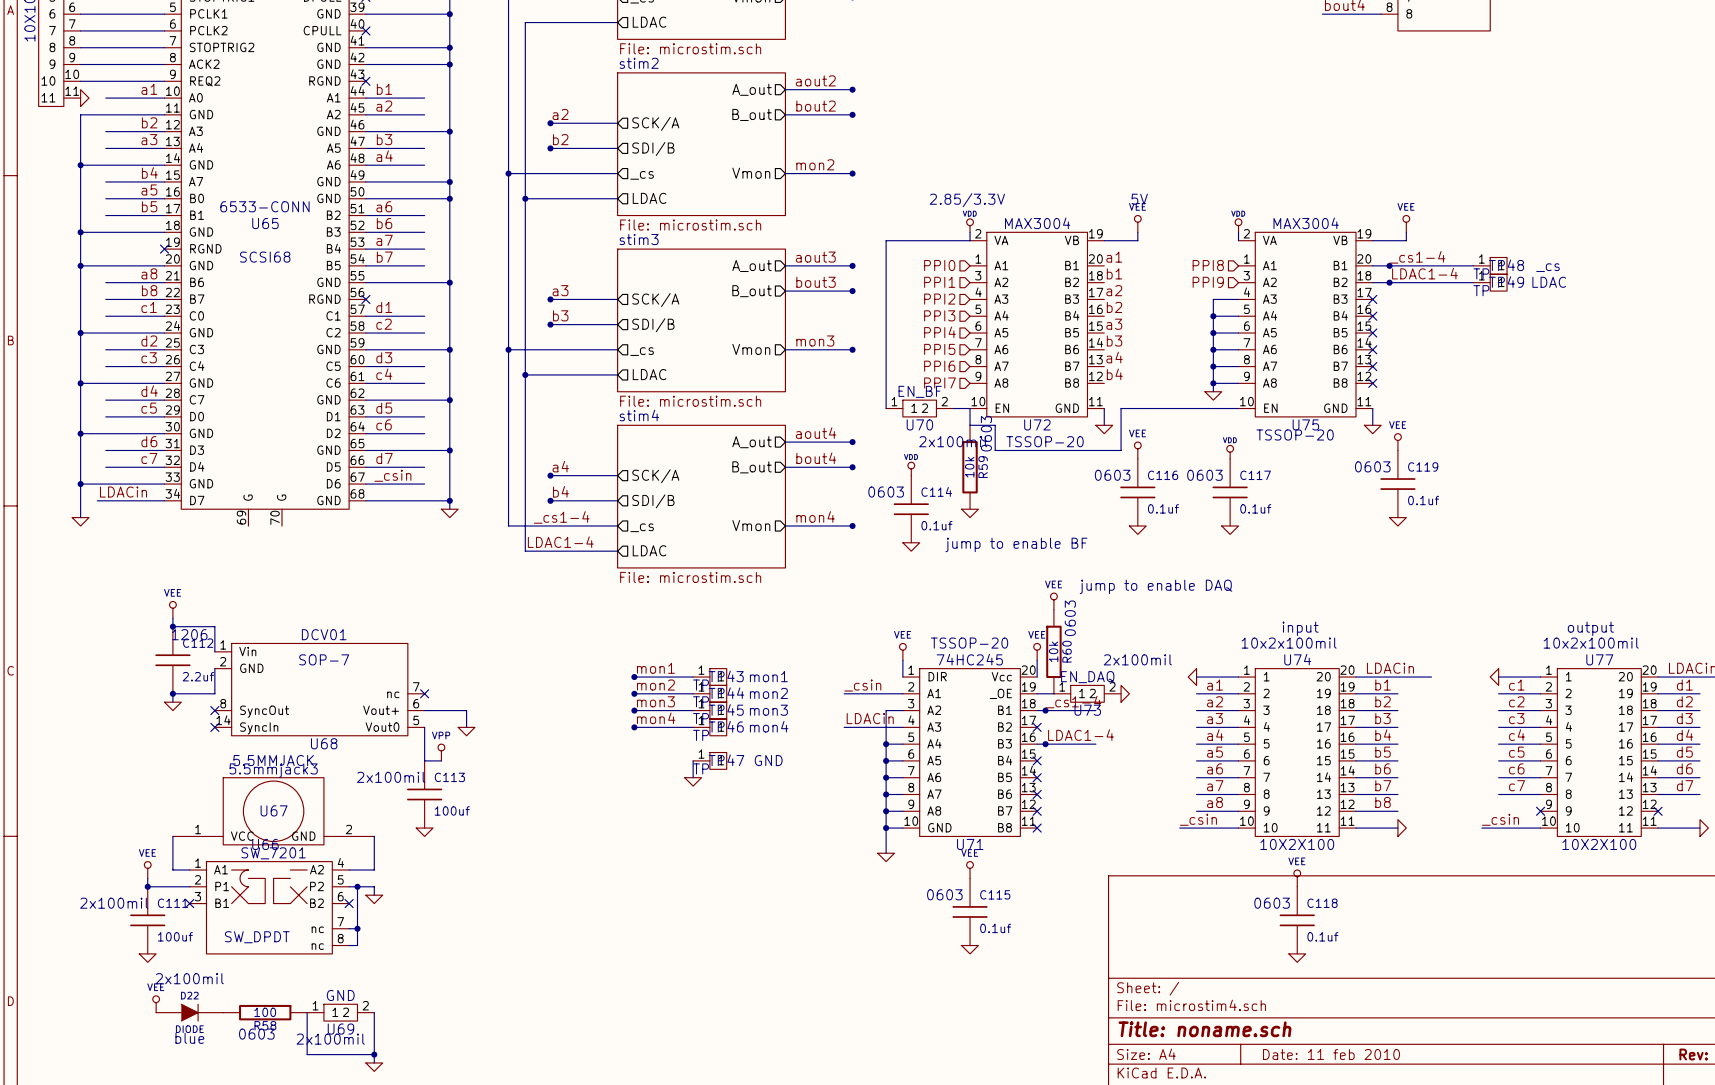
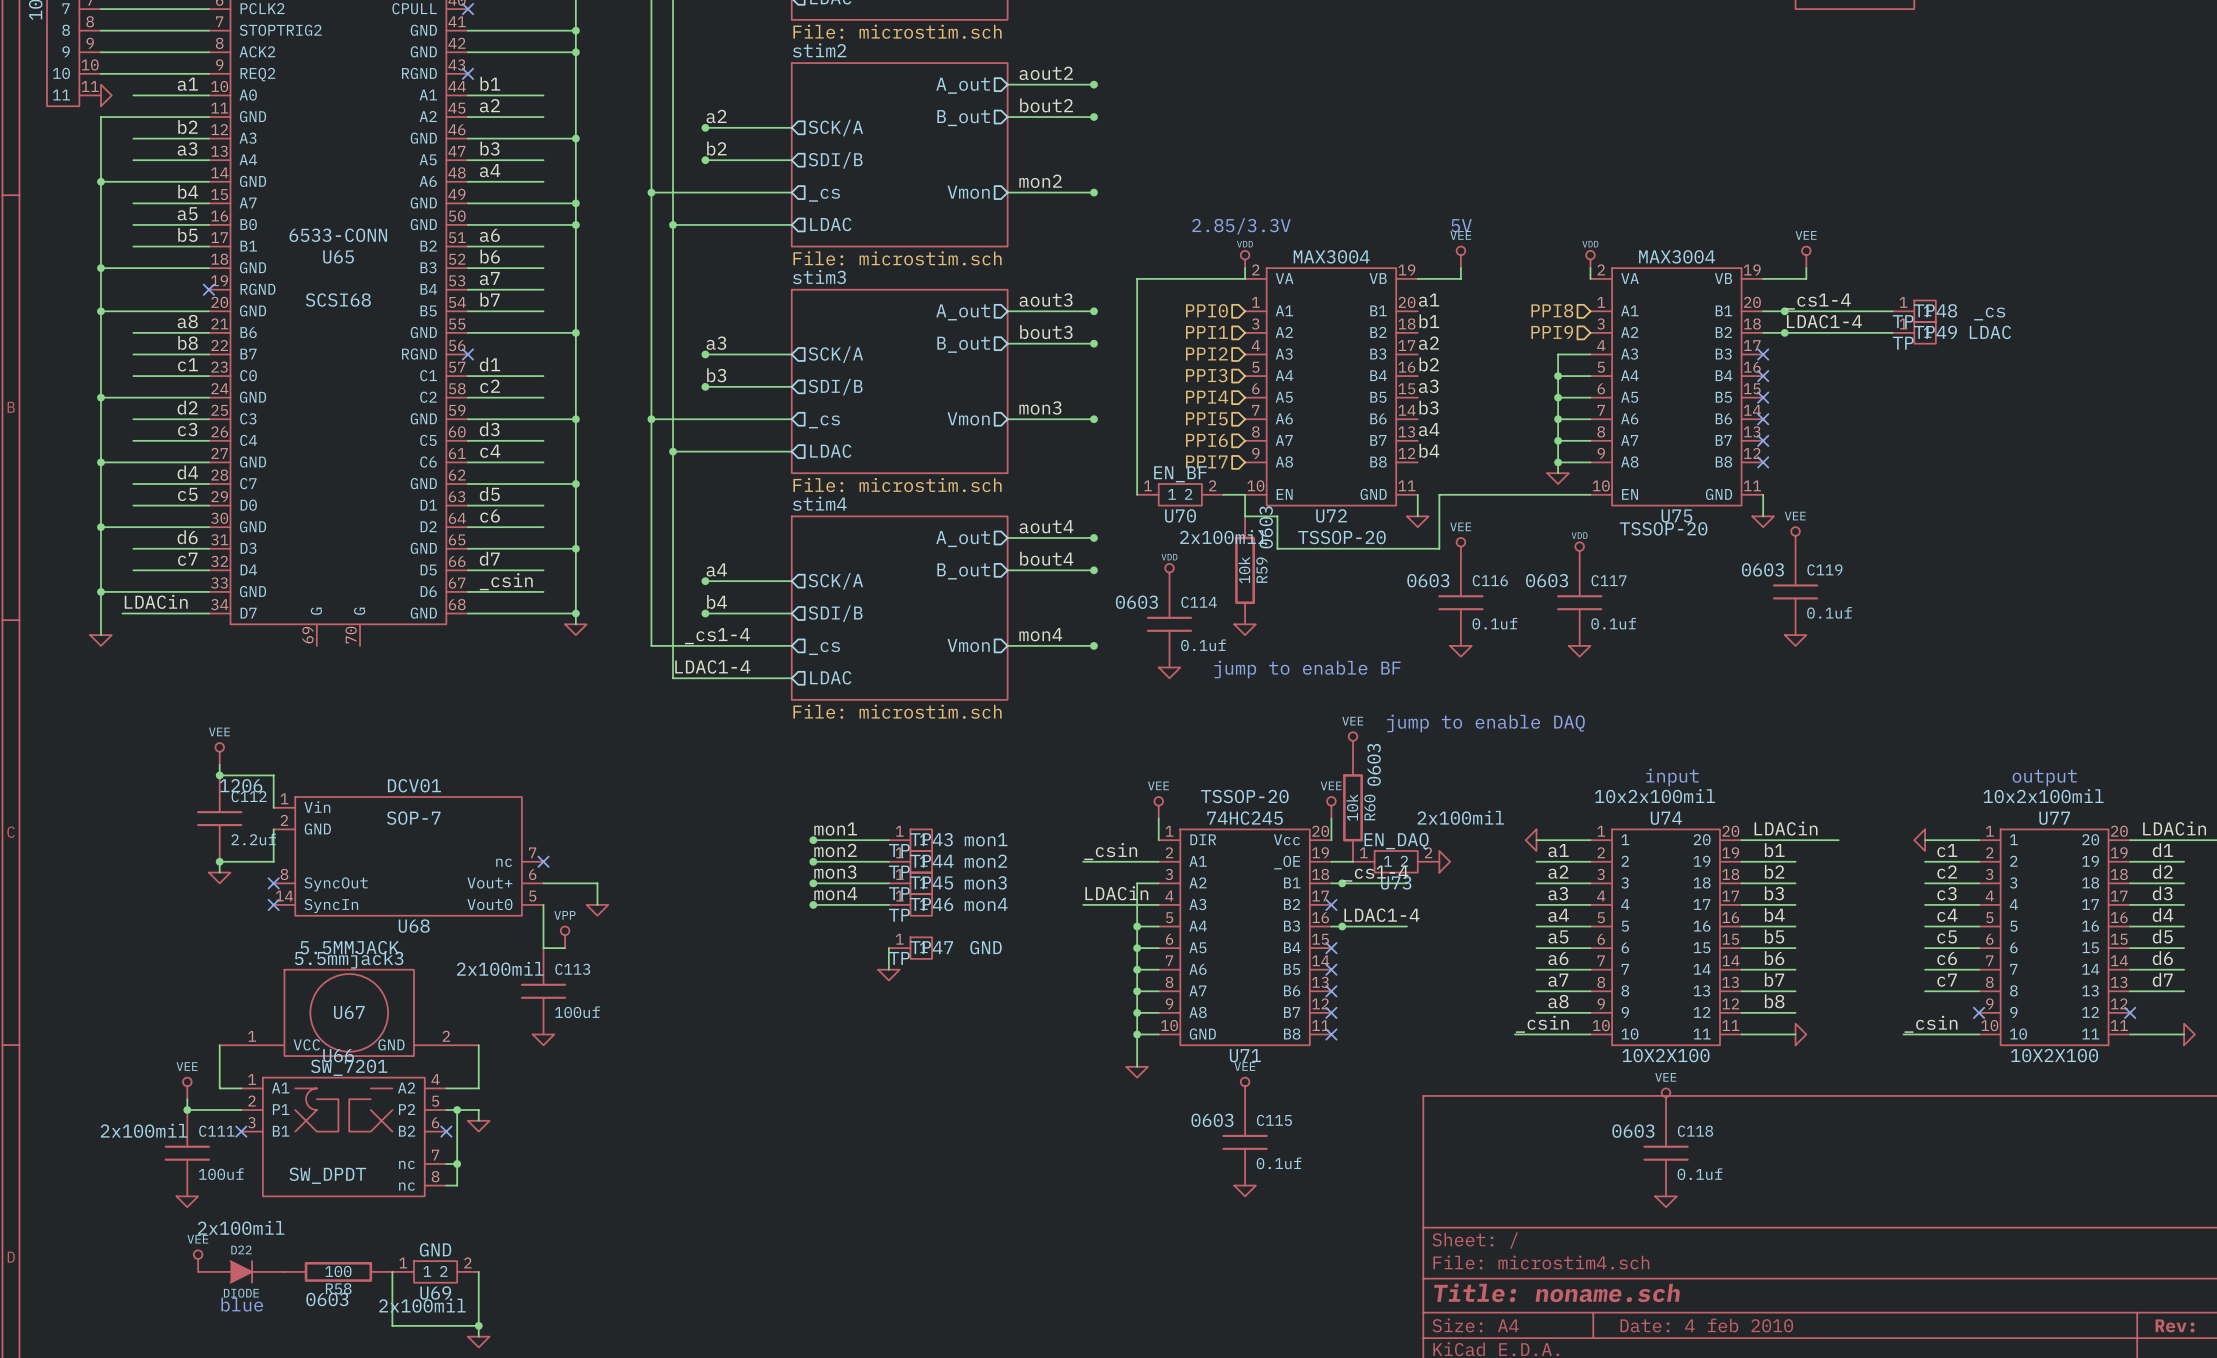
title block: Date: 11 feb 2010 (1331, 1054) -> Date: 4 feb 2010 (1706, 1325)

